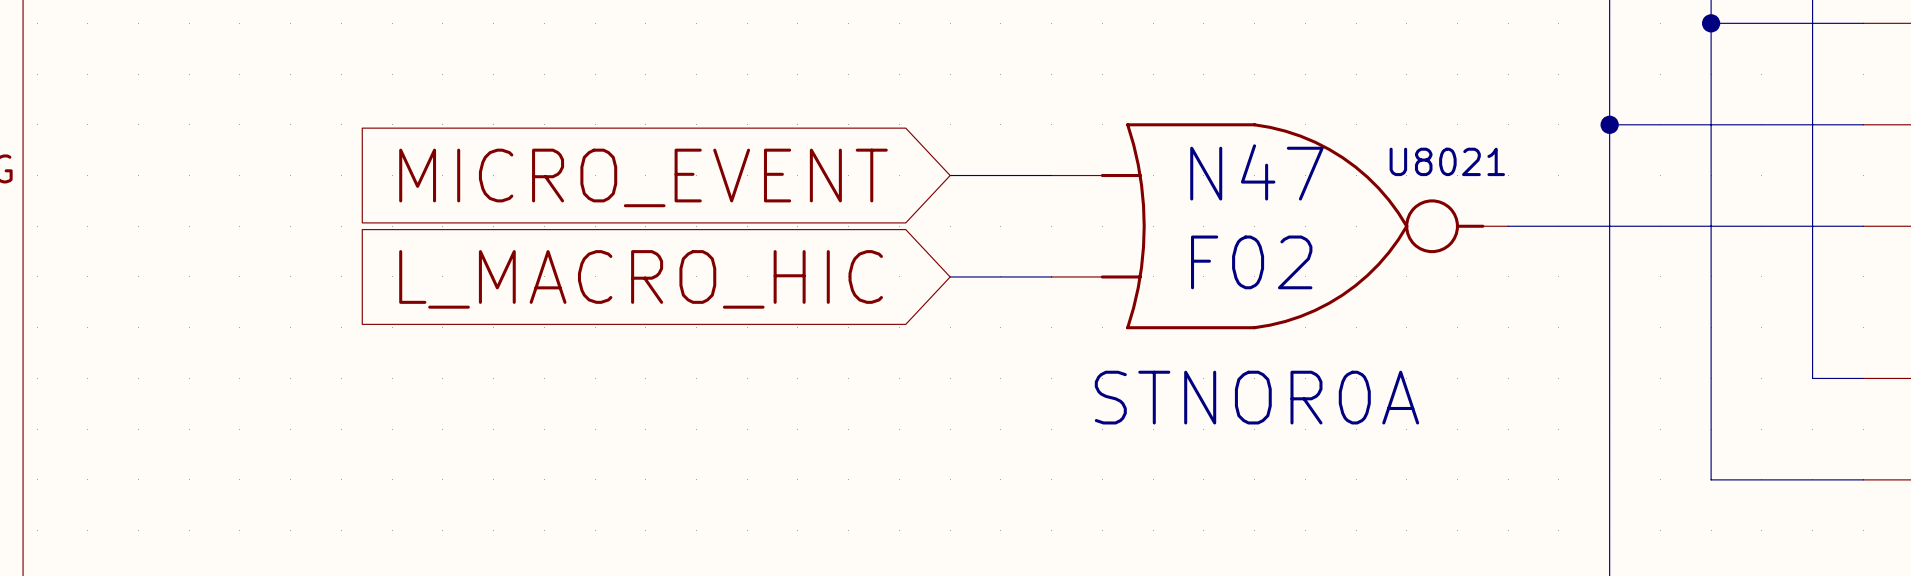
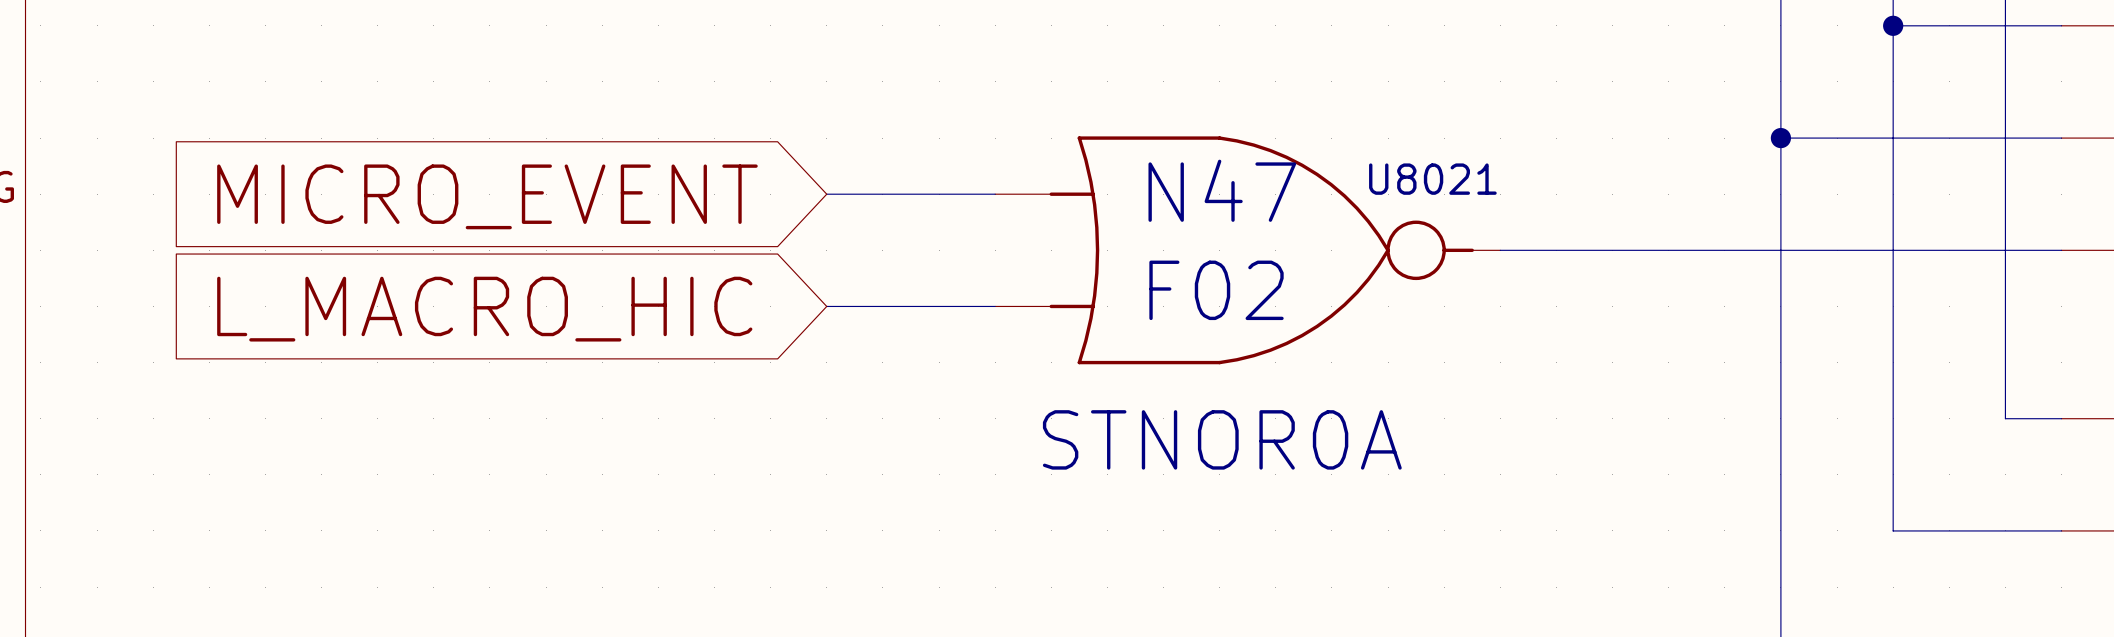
wire: none -> (826, 194) (995, 194)
wire: (950, 175) (1051, 175) -> none
global label position: MICRO_EVENT (643, 177) -> MICRO_EVENT (487, 196)
U8021 position: (1279, 226) -> (1247, 250)
wire: none -> (1500, 250) (1668, 250)
wire: none -> (826, 306) (995, 306)
wire: (950, 276) (1051, 276) -> none
global label position: L_MACRO_HIC (641, 279) -> L_MACRO_HIC (484, 309)

